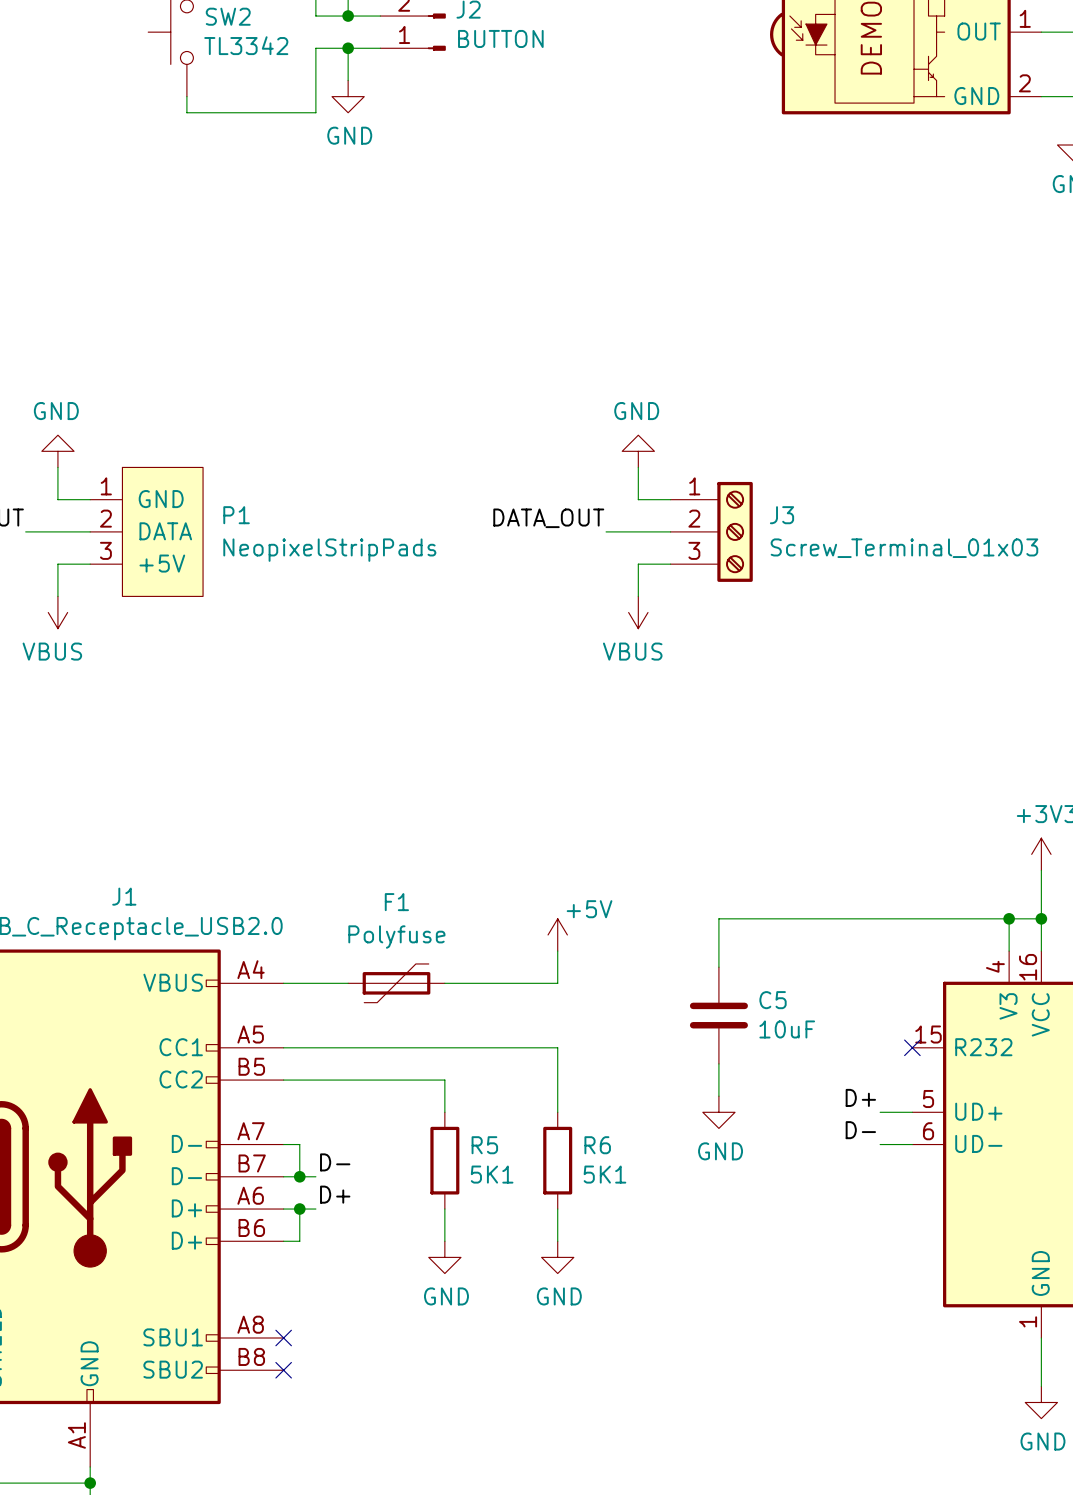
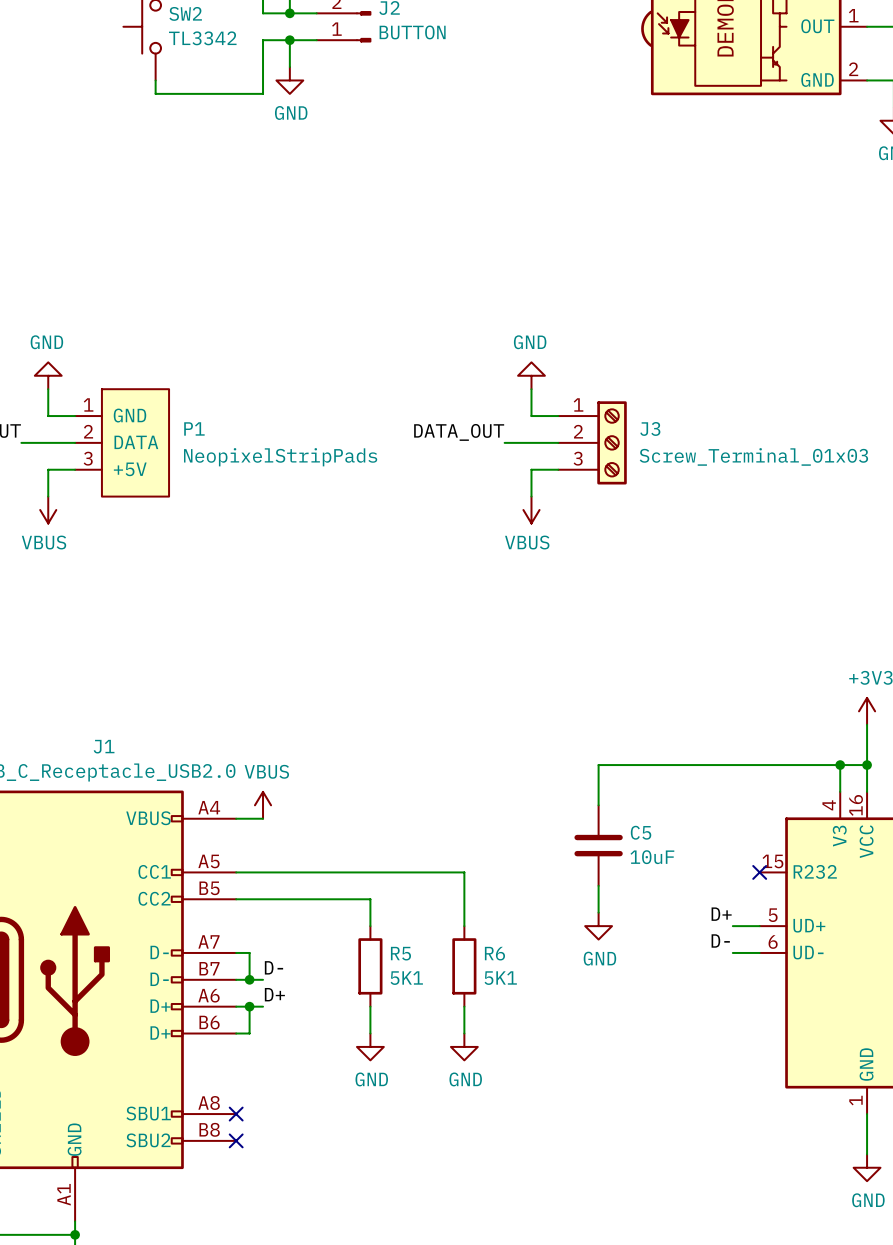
power symbol: +5V (557, 934) -> none
wire: (557, 951) (557, 983) (444, 983) -> none
power symbol: none -> VBUS (263, 805)
wire: (315, 983) (348, 983) -> none
F1: Polyfuse (396, 983) -> none

